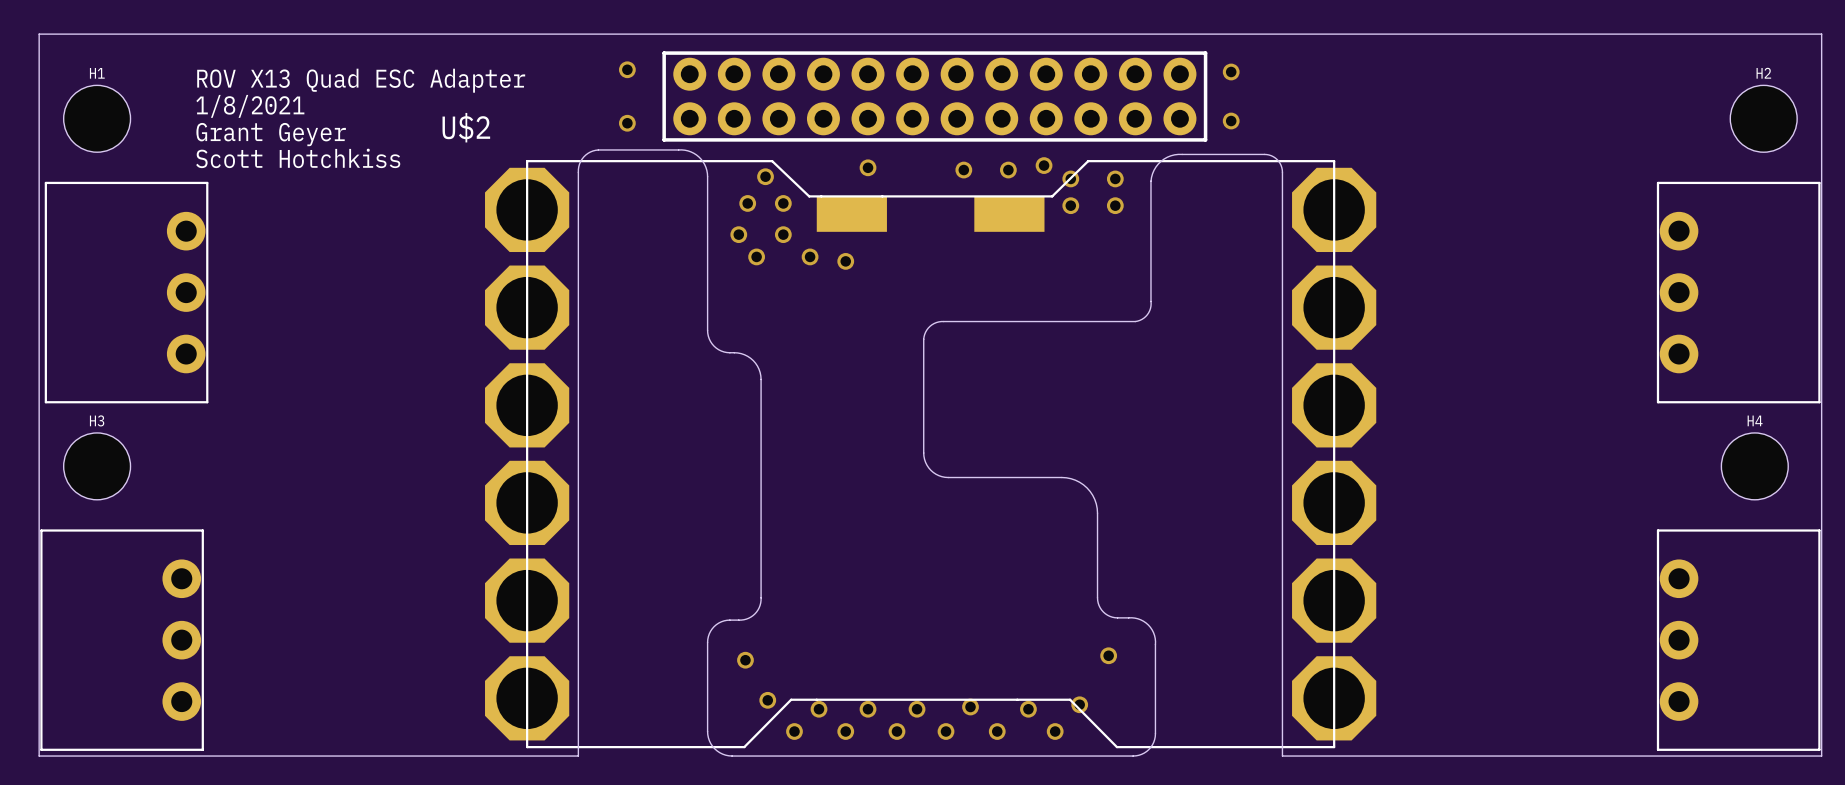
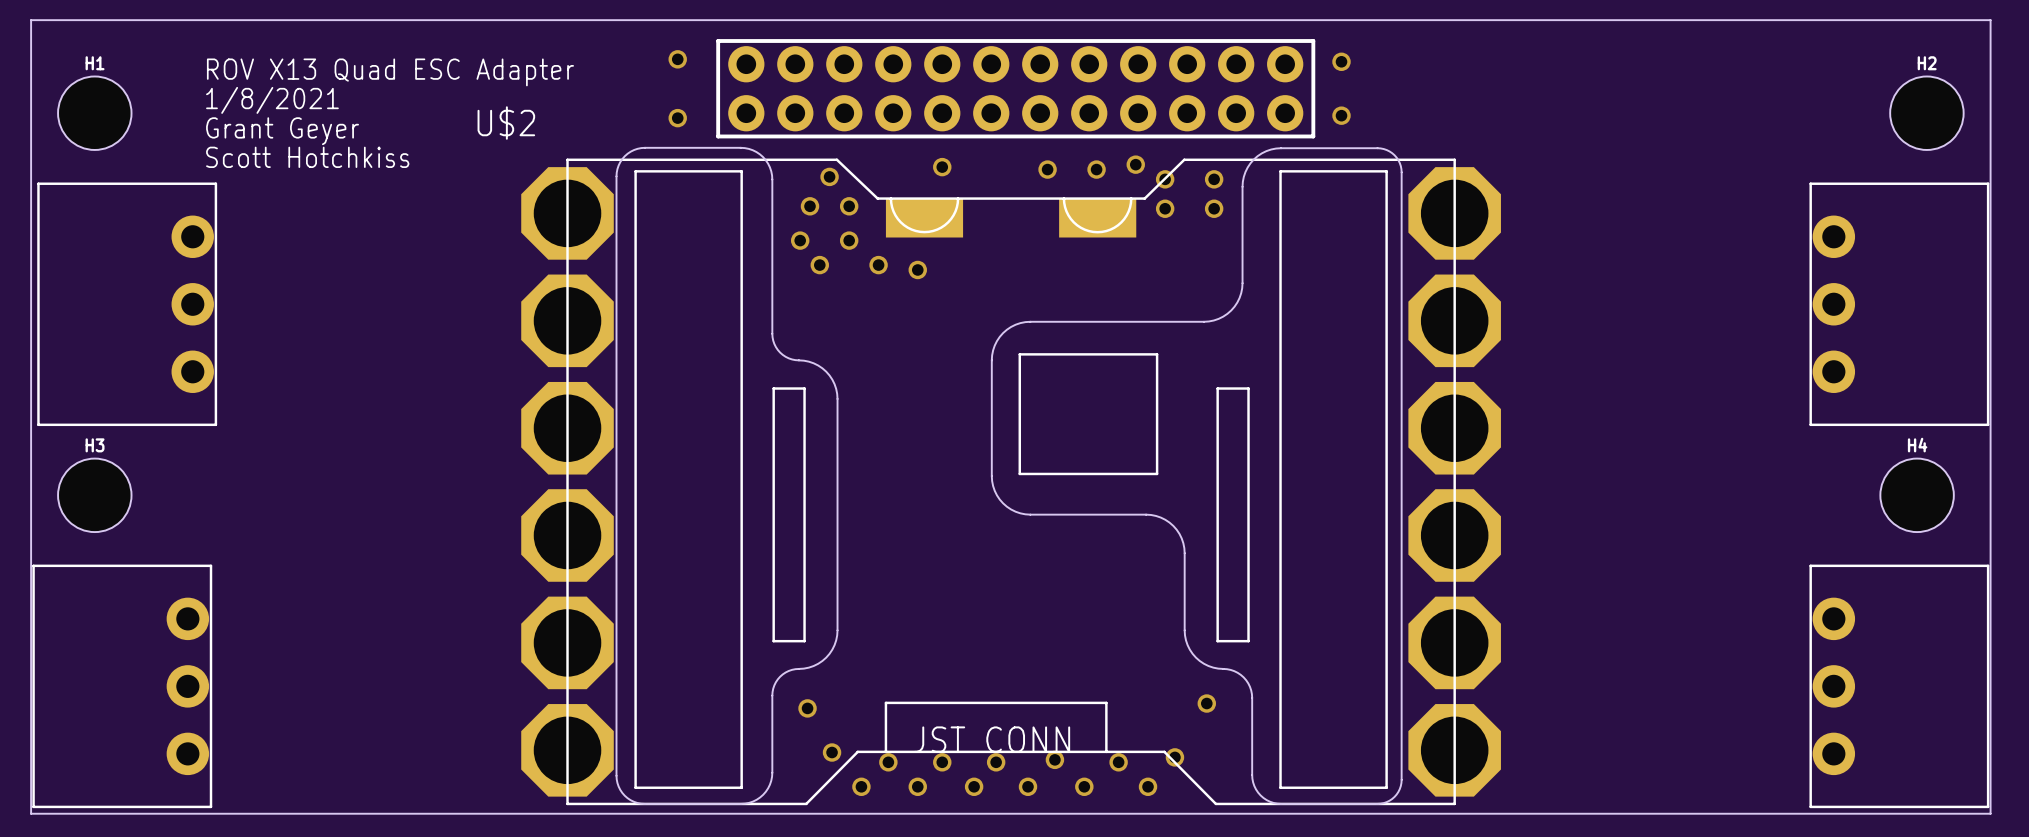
part footprint: [485, 160, 1377, 749] -> [521, 147, 1501, 806]
board edge: (578, 756) (578, 166) (583, 156) (595, 150) (681, 149) (691, 151) (698, 156) (704, 164) (707, 173) (707, 330) (709, 338) (714, 346) (721, 351) (741, 353) (750, 358) (757, 366) (760, 375) (760, 602) (756, 612) (748, 618) (724, 620) (716, 624) (710, 631) (707, 639) (708, 737) (717, 750) (732, 756) -> (623, 813) (792, 813)
board edge: (1133, 756) (1146, 751) (1152, 744) (1155, 736) (1155, 638) (1150, 627) (1143, 621) (1134, 618) (1109, 616) (1103, 612) (1099, 605) (1097, 513) (1092, 495) (1079, 482) (1066, 477) (948, 477) (938, 475) (930, 470) (925, 462) (923, 453) (923, 339) (928, 328) (941, 321) (1135, 321) (1144, 318) (1148, 312) (1151, 303) (1151, 177) (1161, 161) (1178, 154) (1266, 154) (1277, 159) (1282, 169) (1282, 756) -> (1233, 813) (1397, 813)

